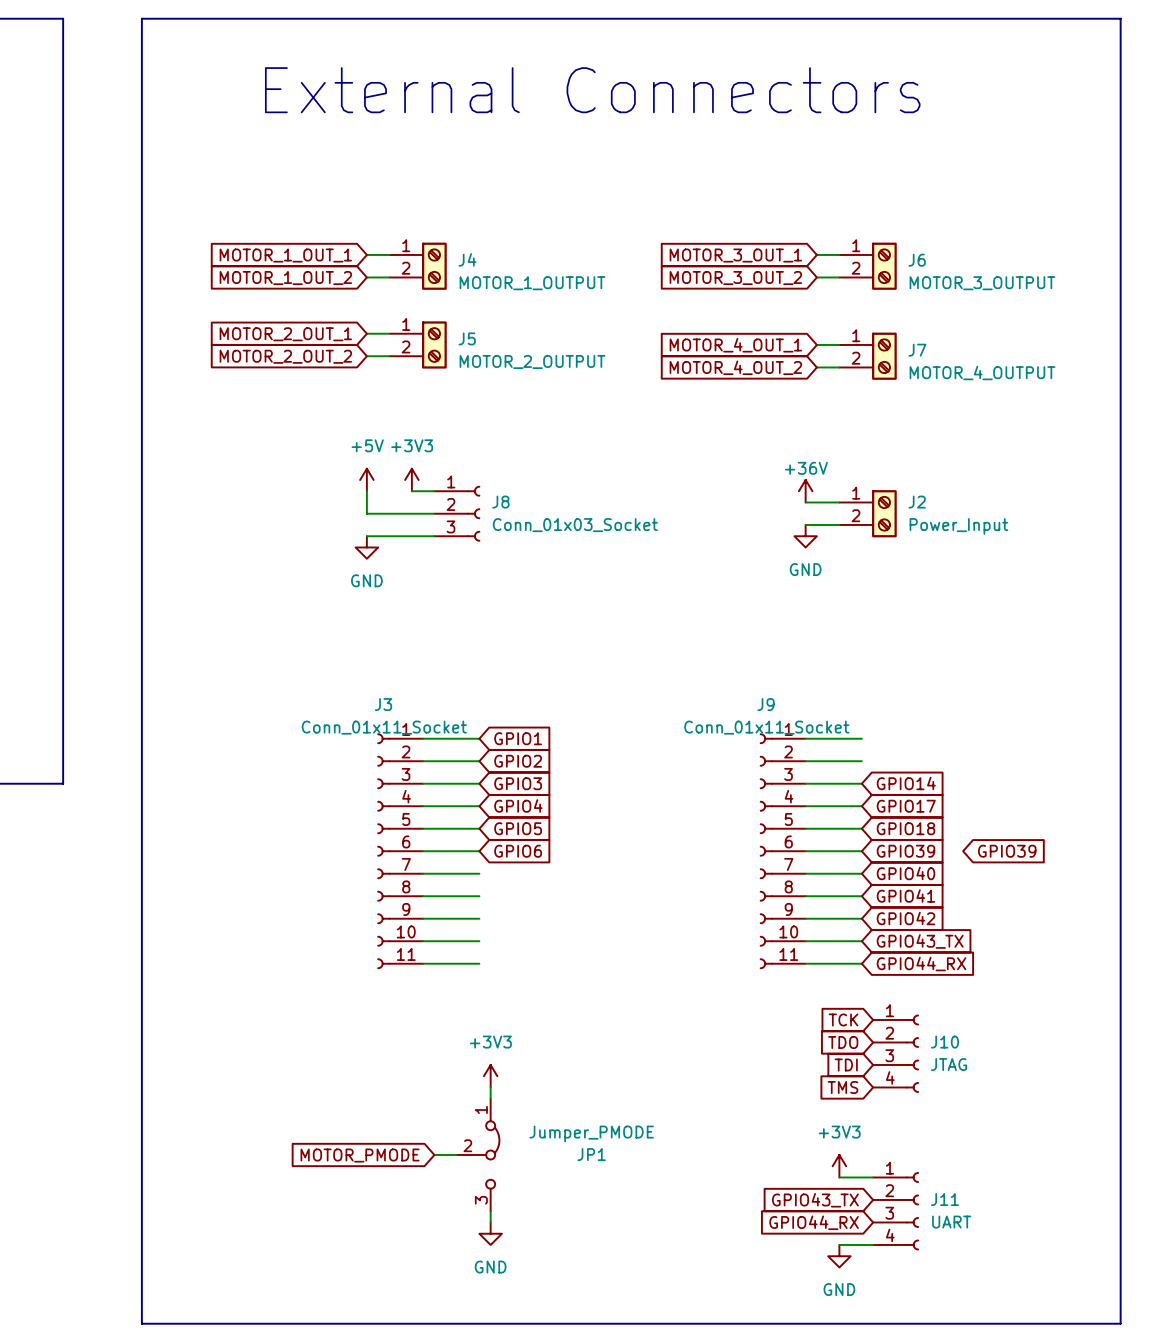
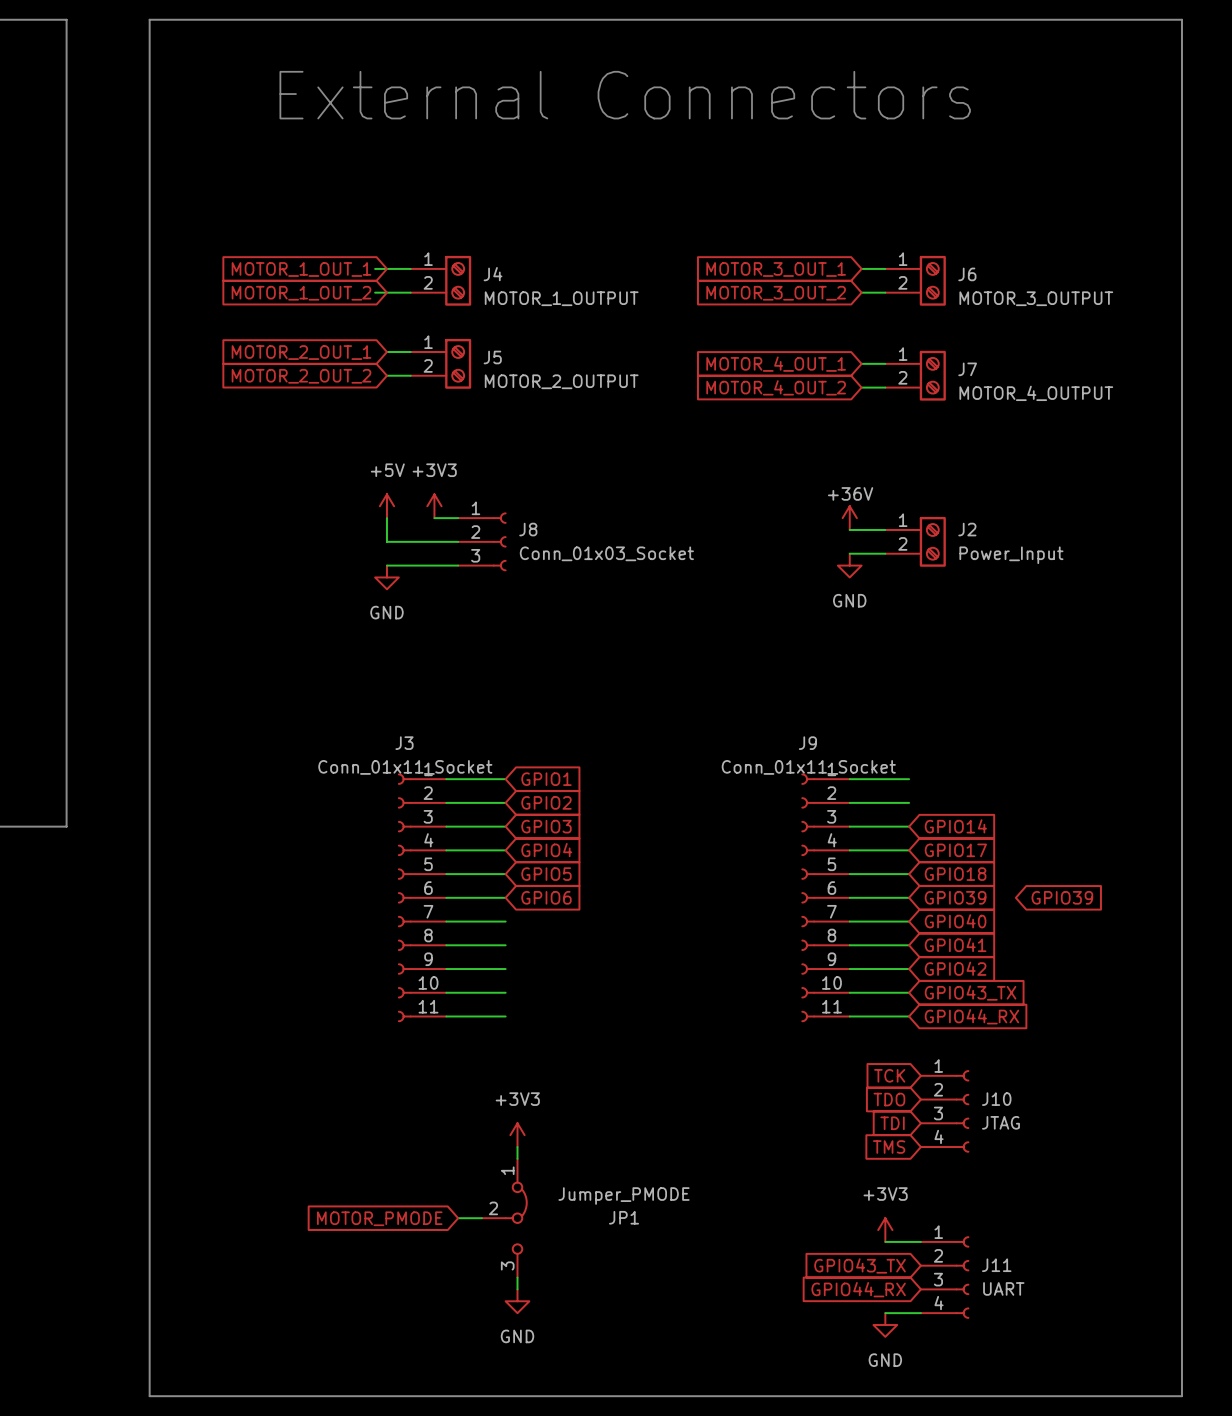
wire: none -> (375, 268) (386, 268)
wire: none -> (375, 292) (386, 292)

